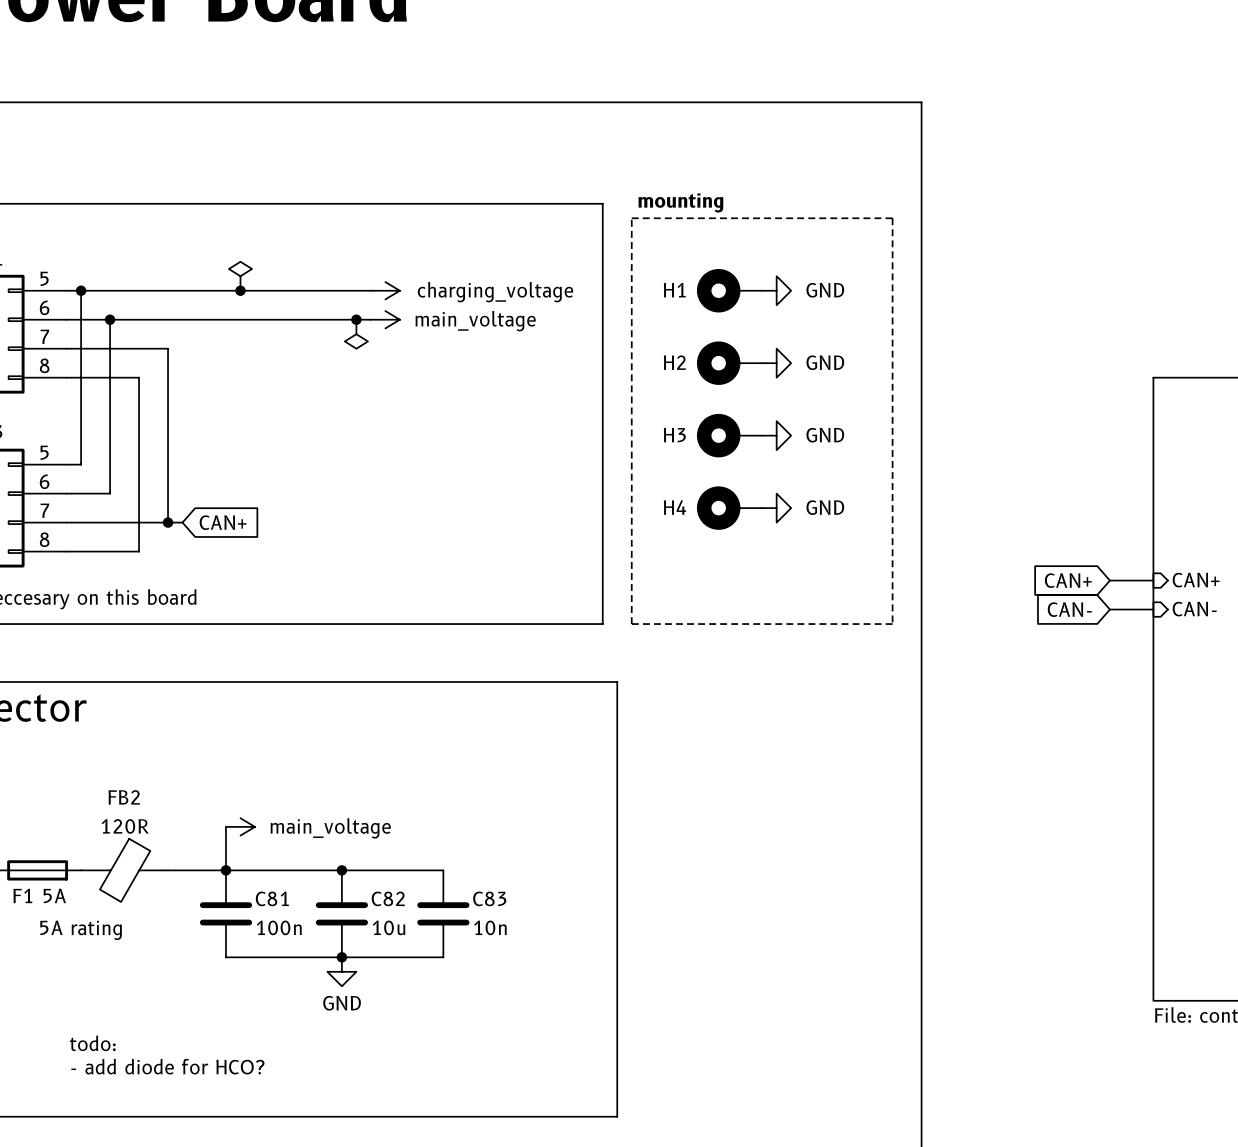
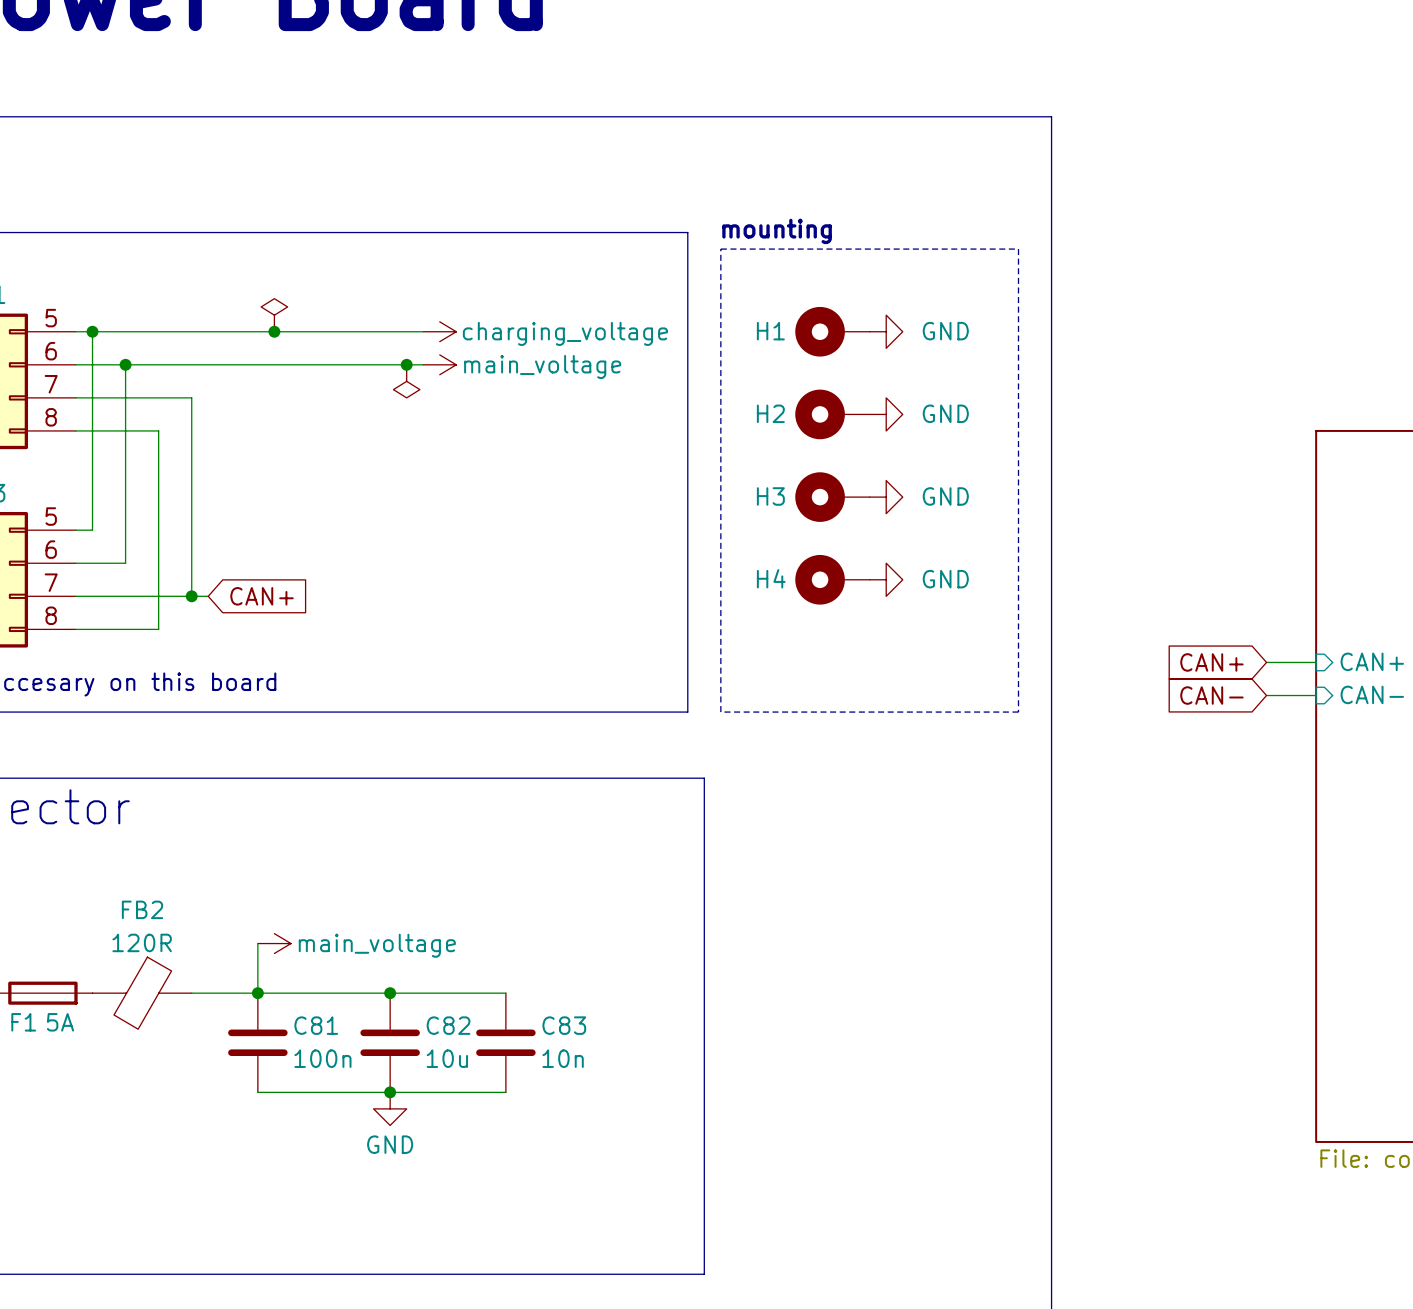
text: 5A rating (81, 930) -> none
text: todo: (92, 1043) -> none
text: - add diode for HCO? (167, 1066) -> none

